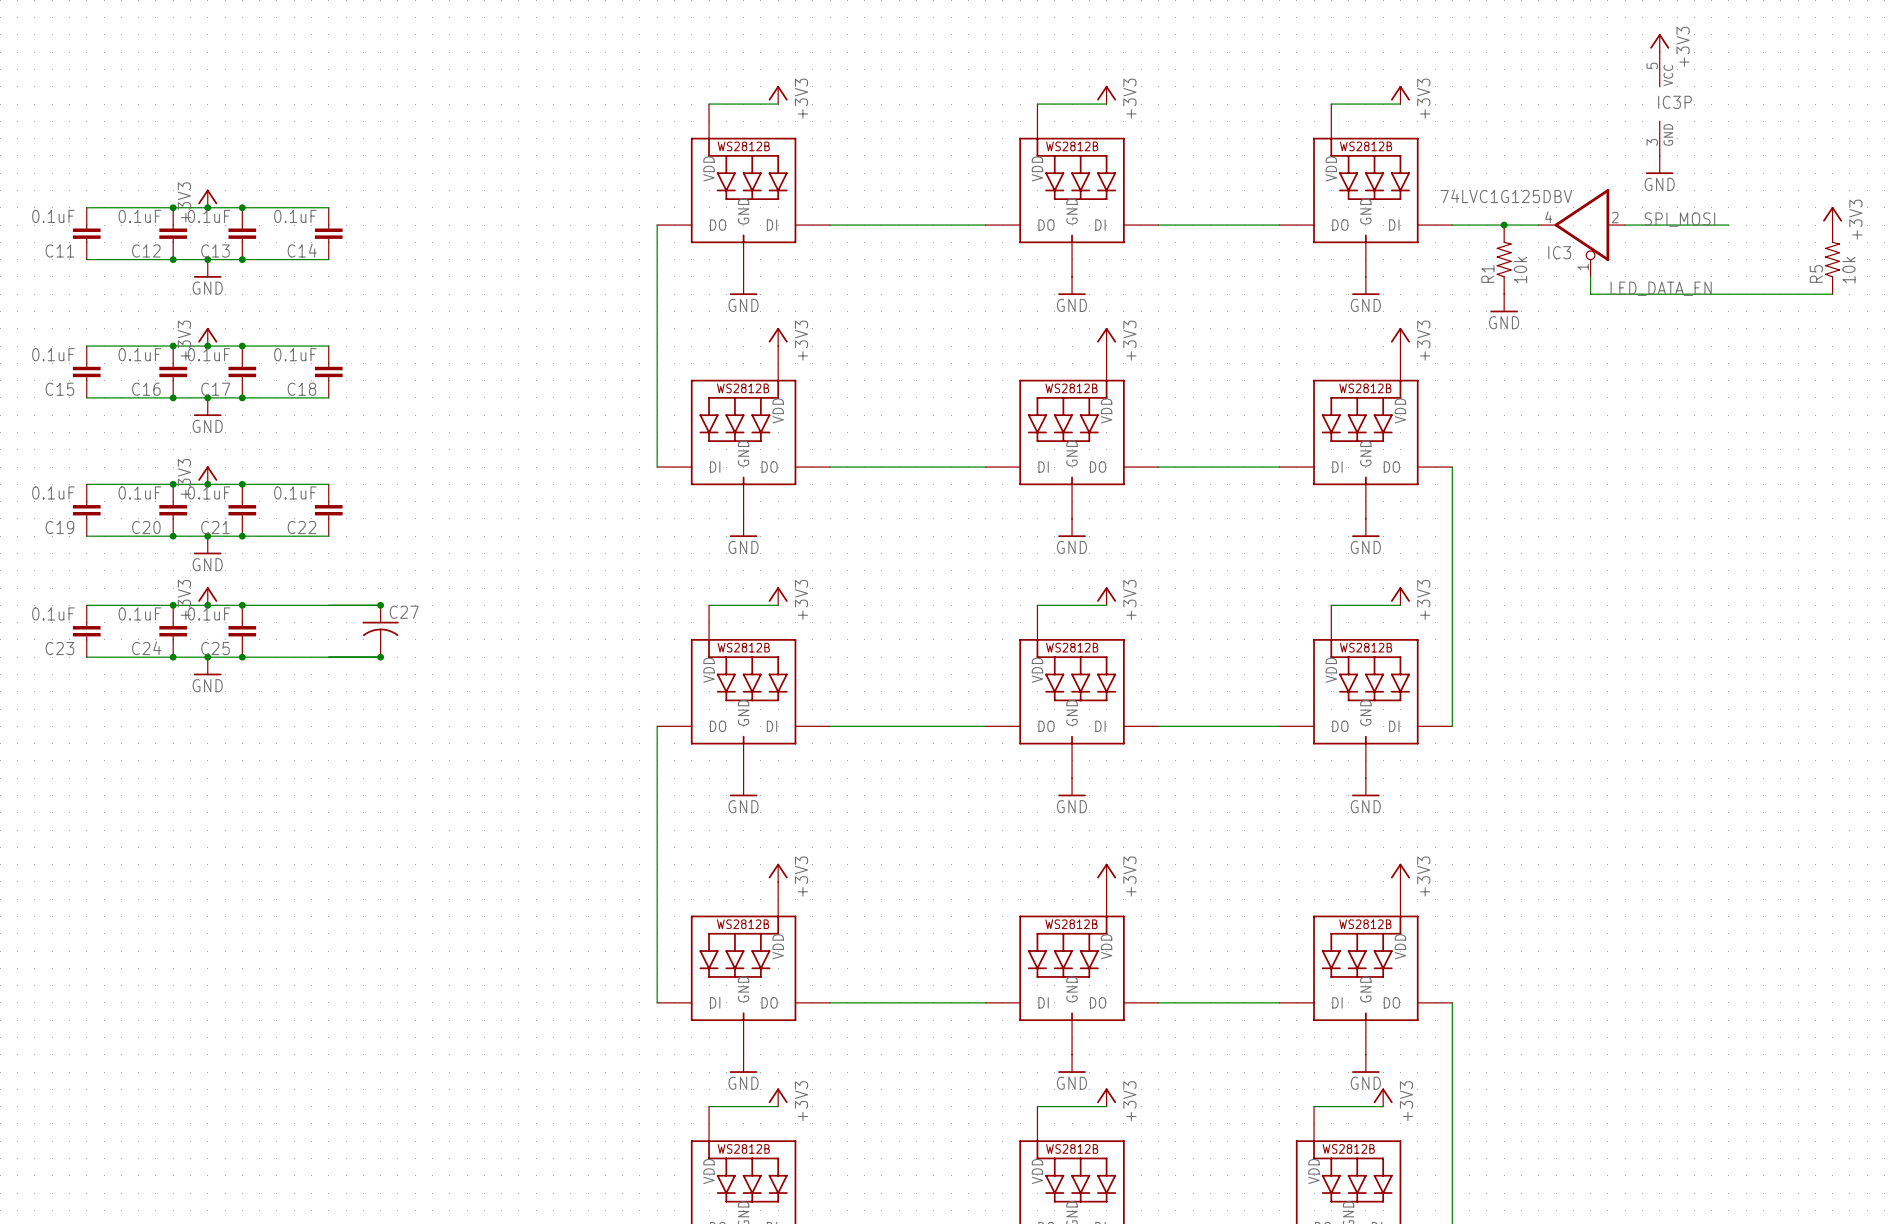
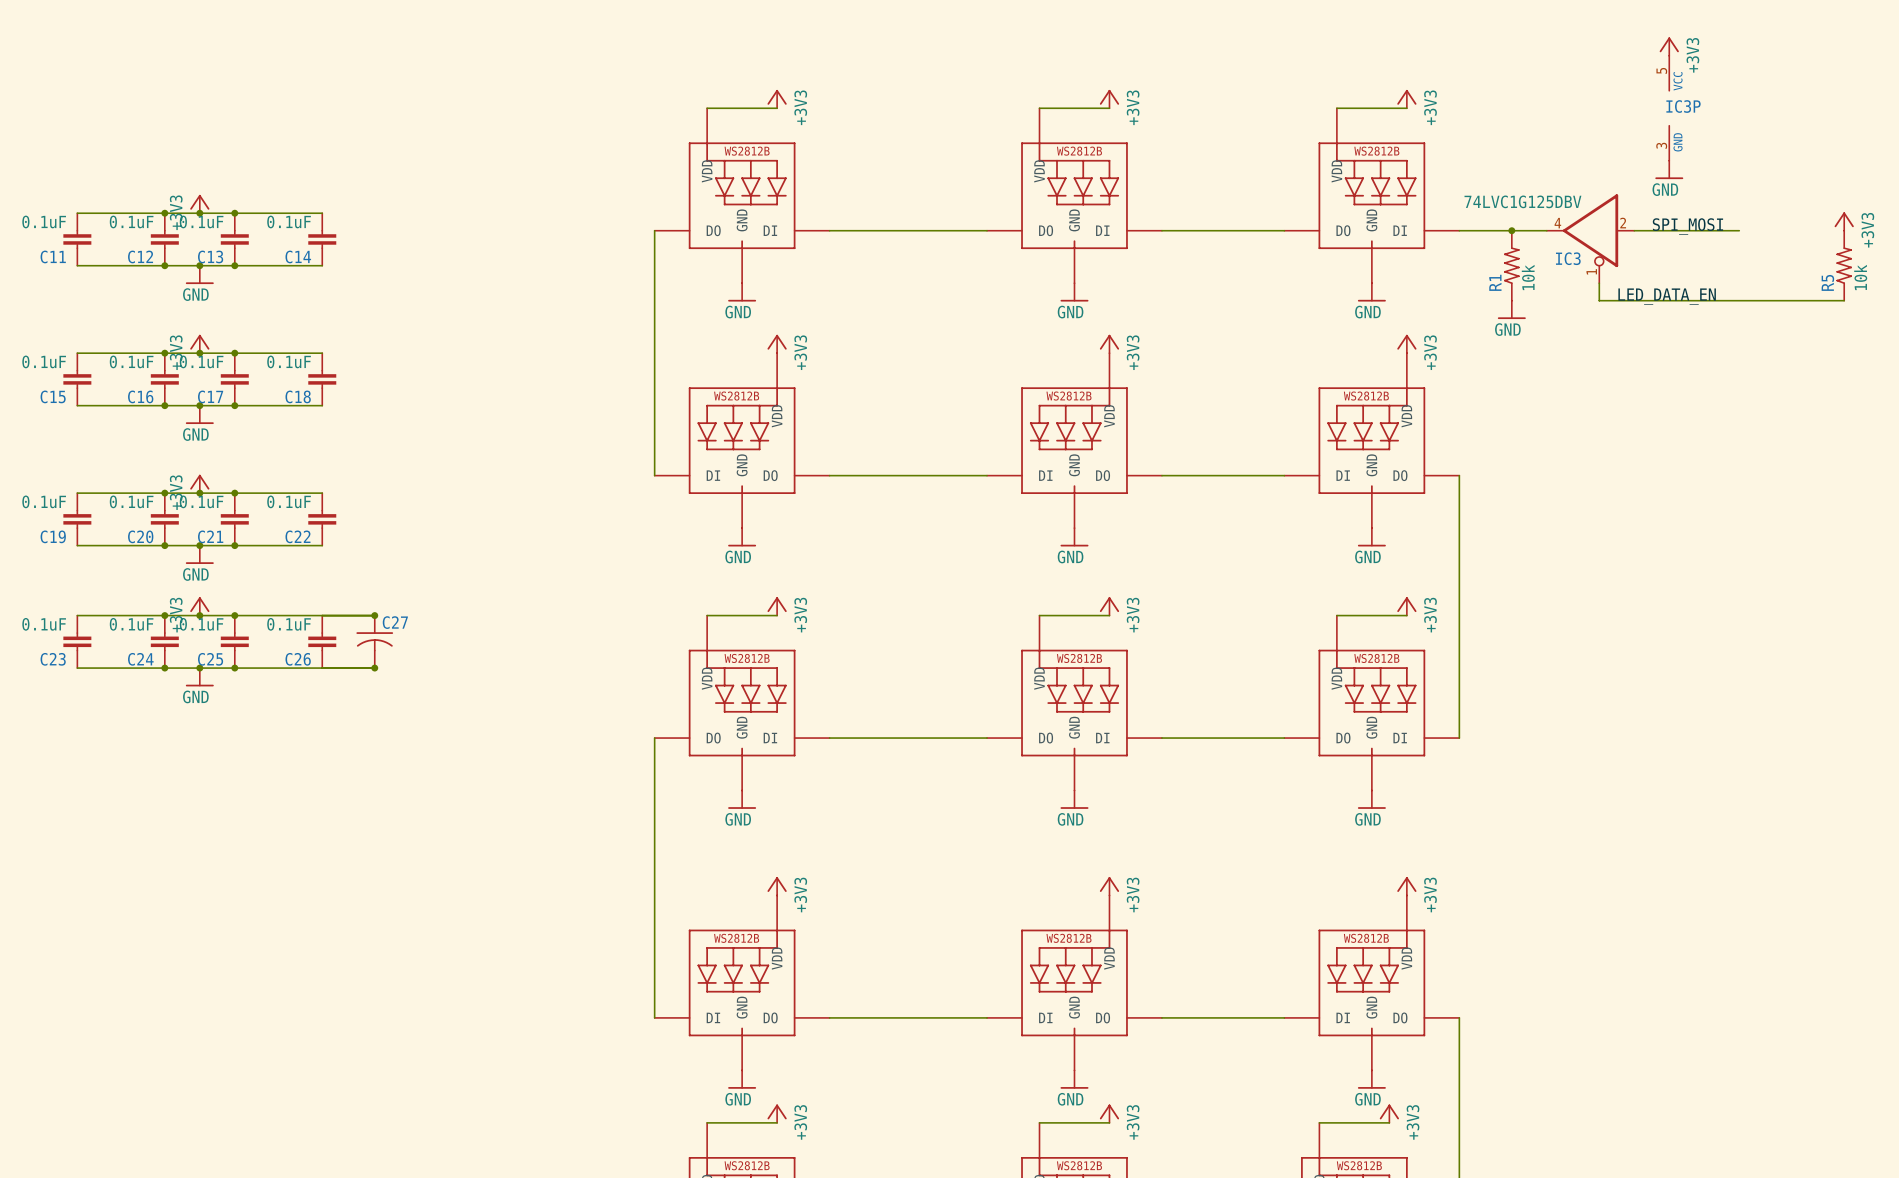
C26: none -> 0.1uF (322, 641)

